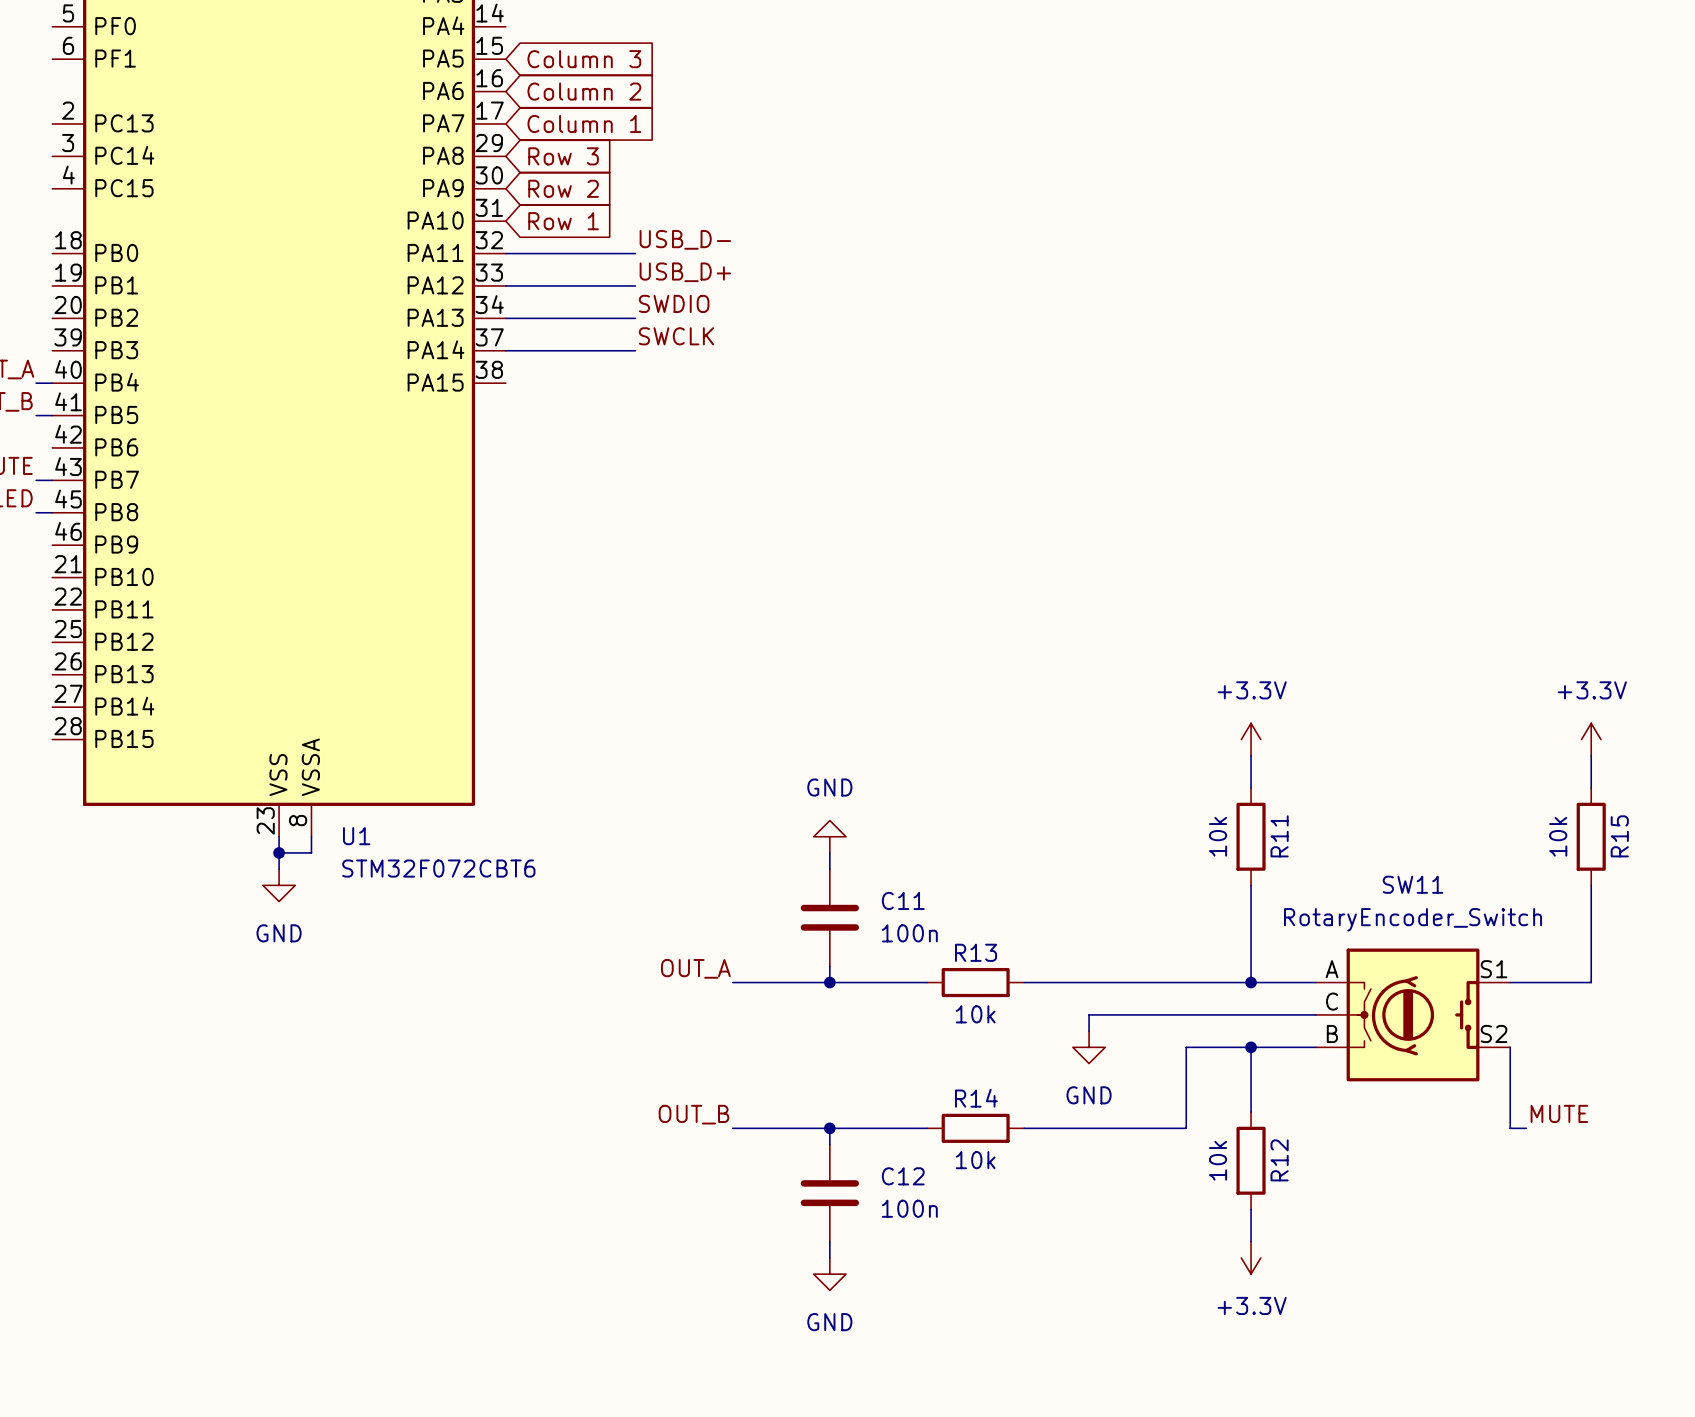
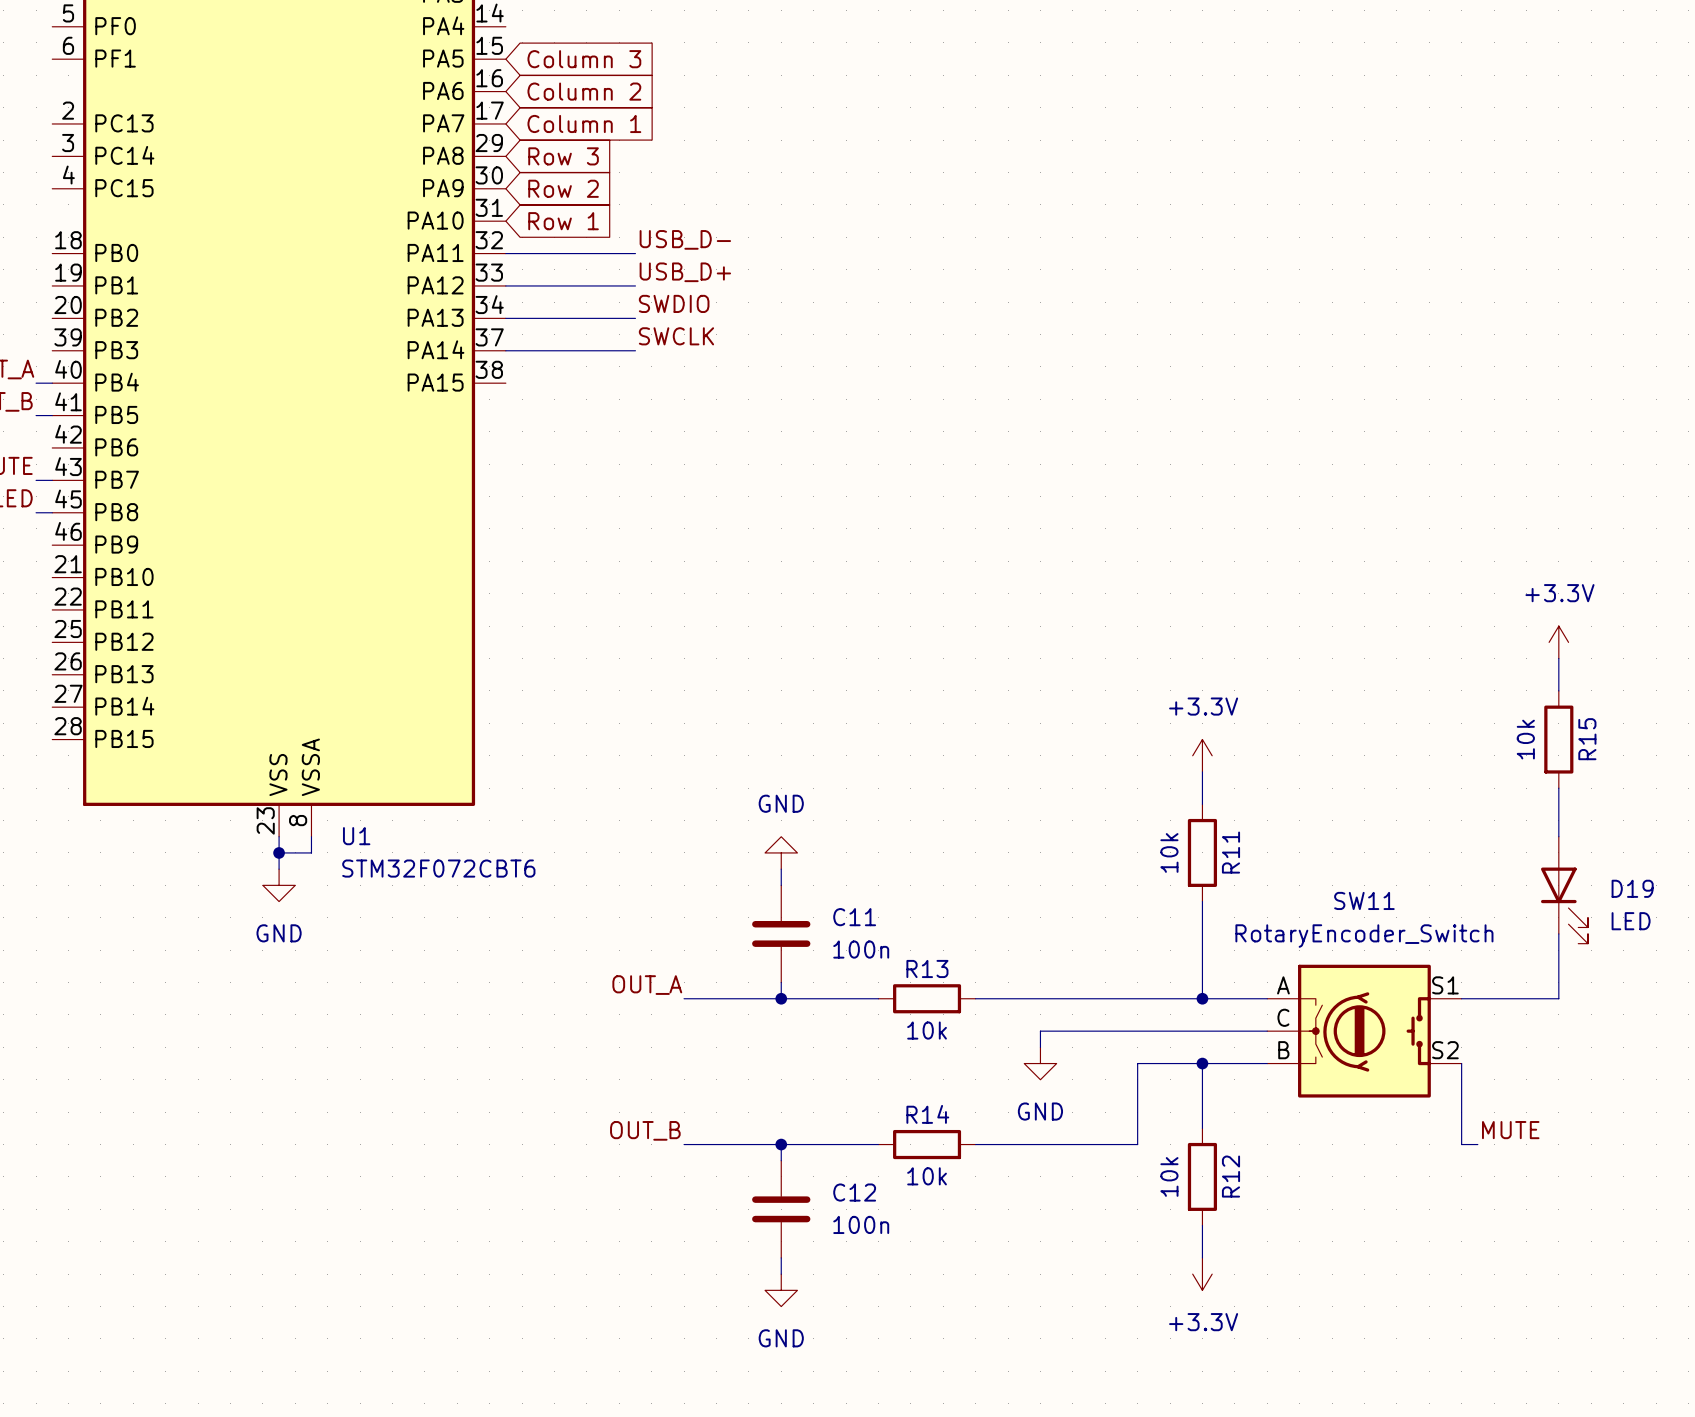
power symbol position: +3.3V (1251, 739) -> +3.3V (1202, 755)
power symbol position: +3.3V (1591, 739) -> +3.3V (1558, 642)
wire: (1251, 755) (1251, 788) -> (1202, 771) (1202, 804)
wire: (1591, 755) (1591, 788) -> (1558, 658) (1558, 690)
wire: none -> (1558, 788) (1558, 836)
power symbol position: GND (829, 836) -> GND (781, 852)
R11 position: (1251, 836) -> (1202, 852)
R15 position: (1591, 836) -> (1558, 739)
wire: (829, 852) (829, 869) -> (781, 869) (781, 885)
wire: (1251, 885) (1251, 982) -> (1202, 901) (1202, 998)
wire: (1591, 885) (1591, 982) (1510, 982) -> none
D19: none -> LED (1564, 890)
C11 position: (829, 917) -> (781, 933)
wire: none -> (1558, 933) (1558, 998) (1461, 998)
wire: (829, 966) (829, 982) -> (781, 982) (781, 998)
label position: OUT_A (695, 968) -> OUT_A (647, 985)
wire: (732, 982) (927, 982) -> (684, 998) (878, 998)
junction position: (829, 982) -> (781, 998)
R13 position: (975, 982) -> (927, 998)
wire: (1024, 982) (1315, 982) -> (975, 998) (1267, 998)
junction: (1251, 982) -> none
junction: none -> (1202, 998)
wire: (1315, 1014) (1089, 1014) (1089, 1031) -> (1267, 1031) (1040, 1031) (1040, 1047)
SW11 position: (1413, 1014) -> (1364, 1031)
power symbol position: GND (1089, 1047) -> GND (1040, 1063)
wire: (1251, 1047) (1251, 1112) -> (1202, 1063) (1202, 1128)
junction: (1251, 1047) -> none
wire: (1315, 1047) (1186, 1047) (1186, 1128) (1024, 1128) -> (1267, 1063) (1137, 1063) (1137, 1144) (975, 1144)
wire: (1510, 1047) (1510, 1128) (1526, 1128) -> (1461, 1063) (1461, 1144) (1477, 1144)
junction: none -> (1202, 1063)
label position: MUTE (1559, 1113) -> MUTE (1510, 1130)
label position: OUT_B (693, 1114) -> OUT_B (645, 1130)
wire: (732, 1128) (927, 1128) -> (684, 1144) (878, 1144)
wire: (829, 1128) (829, 1144) -> (781, 1144) (781, 1160)
junction position: (829, 1128) -> (781, 1144)
R14 position: (975, 1128) -> (927, 1144)
R12 position: (1251, 1160) -> (1202, 1176)
C12 position: (829, 1193) -> (781, 1209)
wire: (1251, 1209) (1251, 1241) -> (1202, 1225) (1202, 1257)
wire: (829, 1241) (829, 1257) -> (781, 1257) (781, 1274)
power symbol position: +3.3V (1251, 1257) -> +3.3V (1202, 1274)
power symbol position: GND (829, 1274) -> GND (781, 1290)

